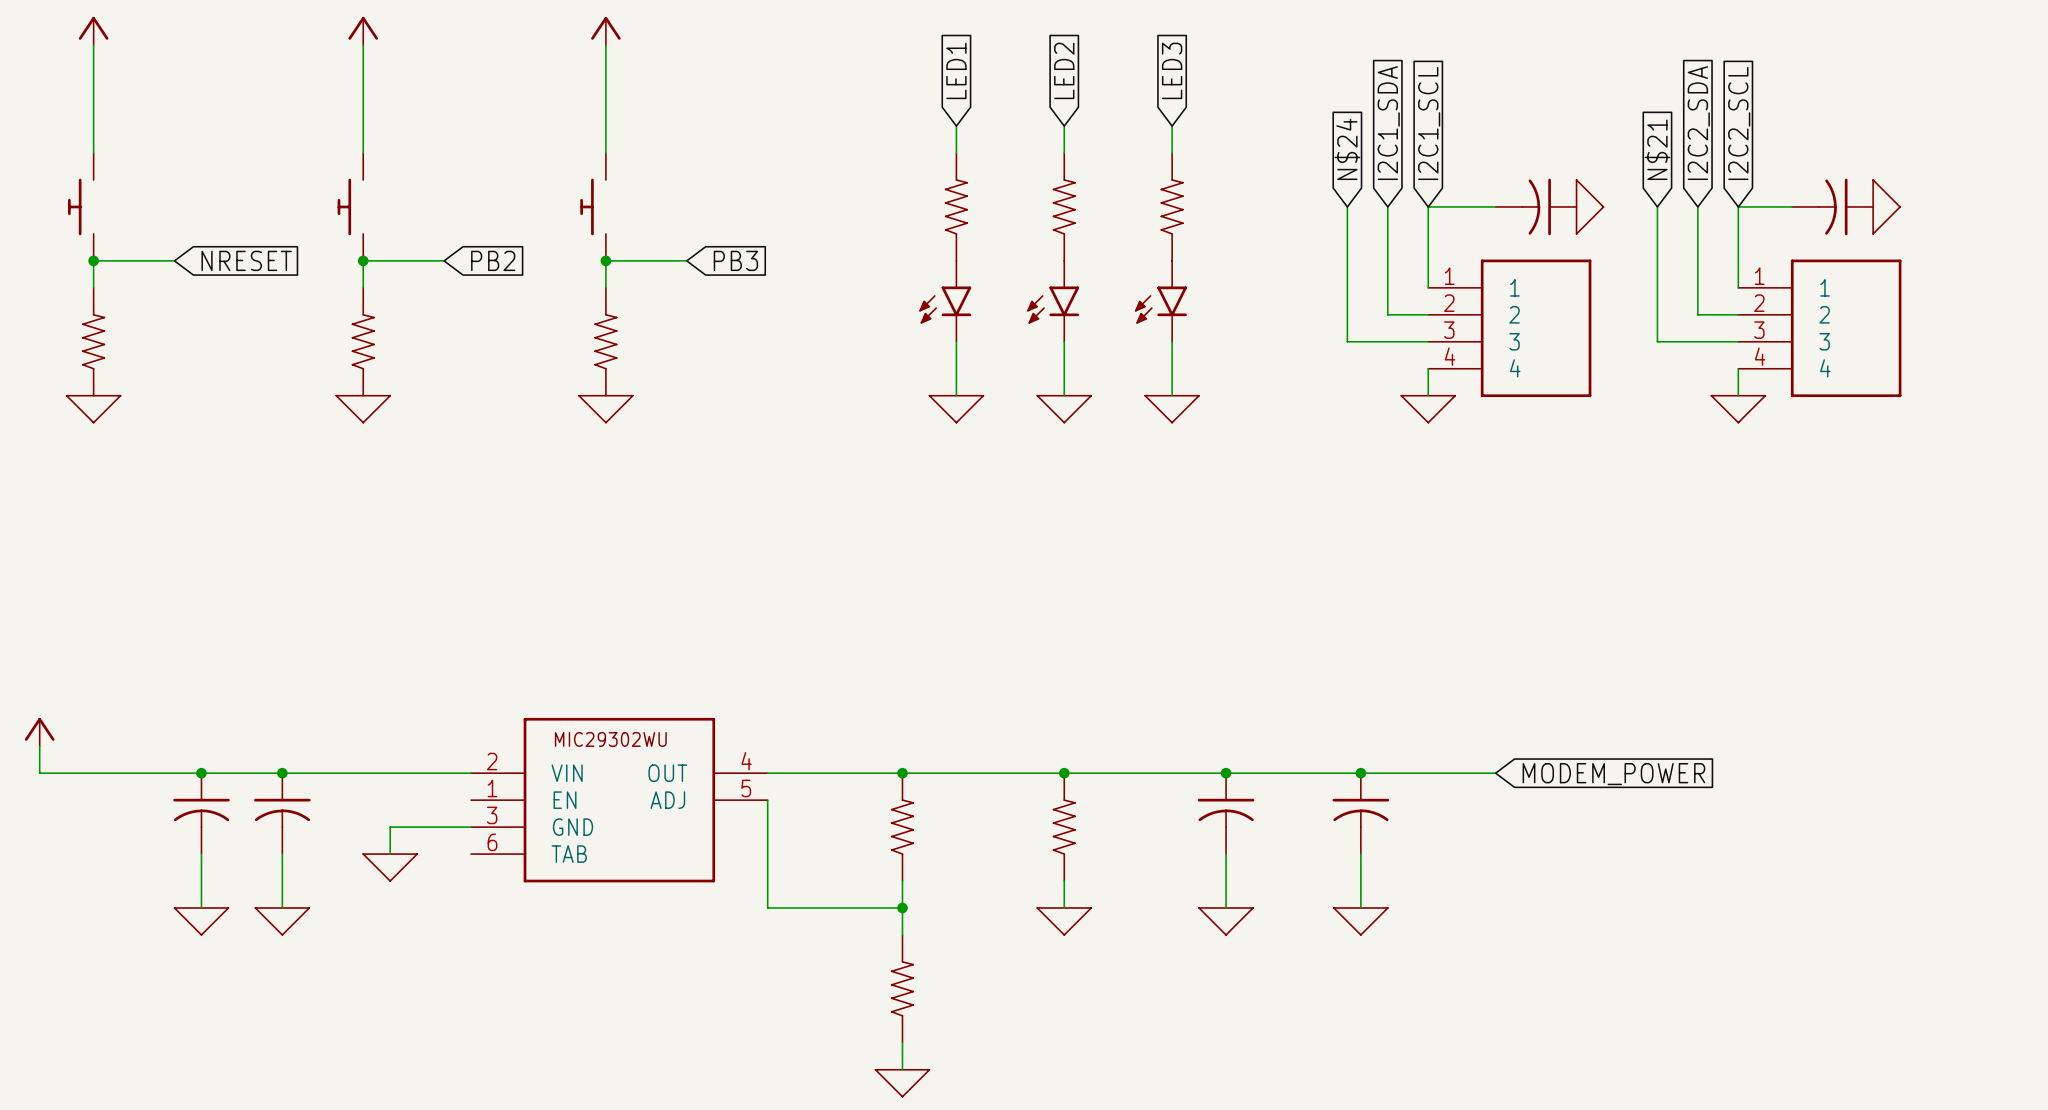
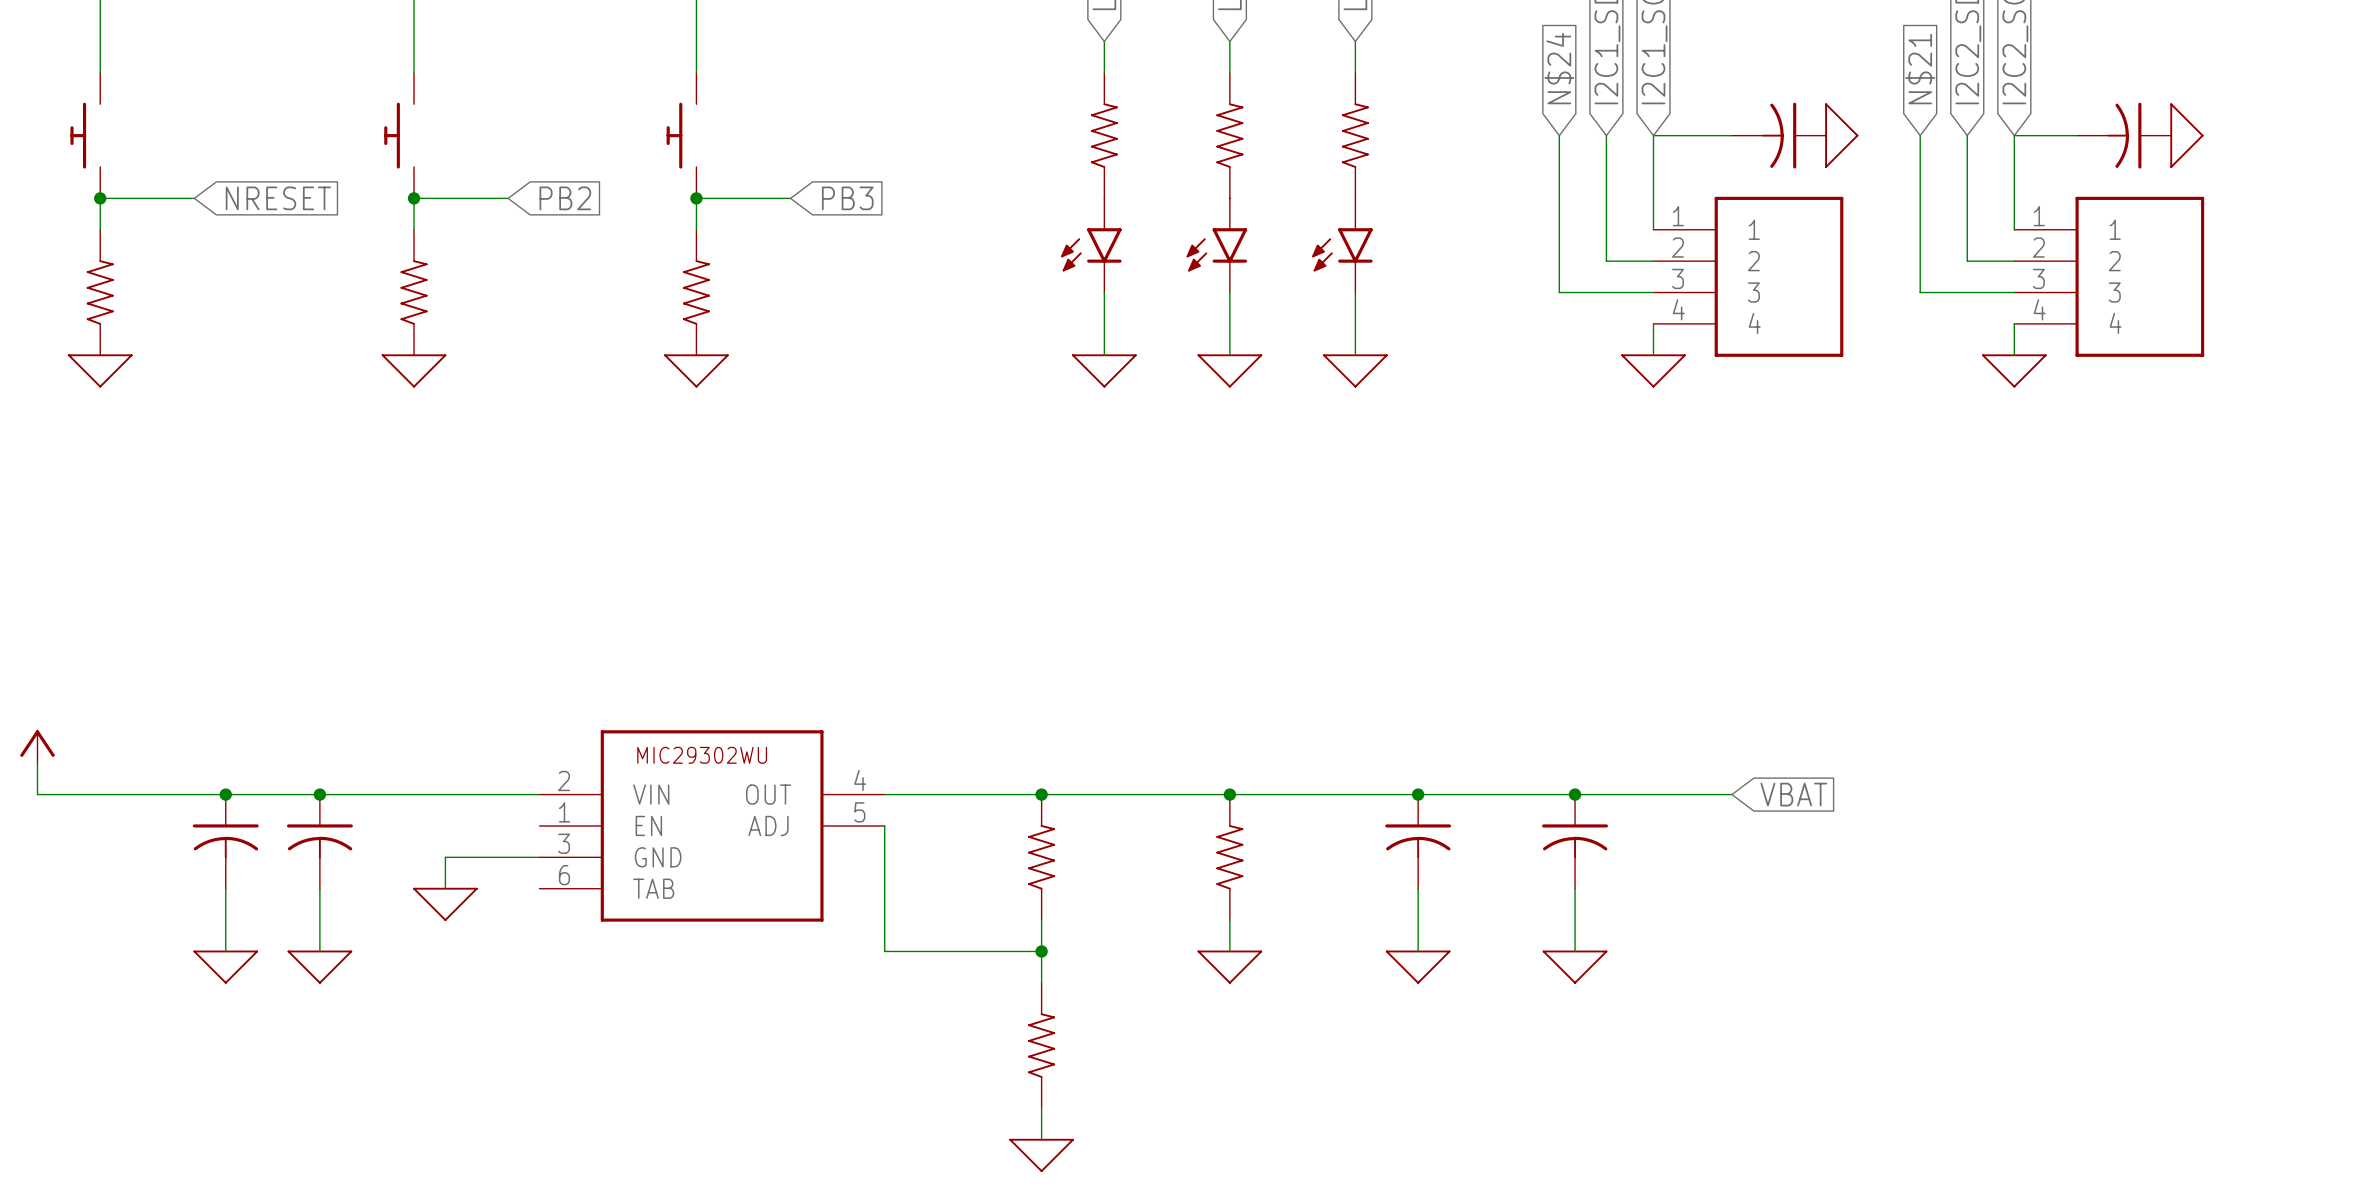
global label: MODEM_POWER (1613, 774) -> VBAT (1793, 794)

